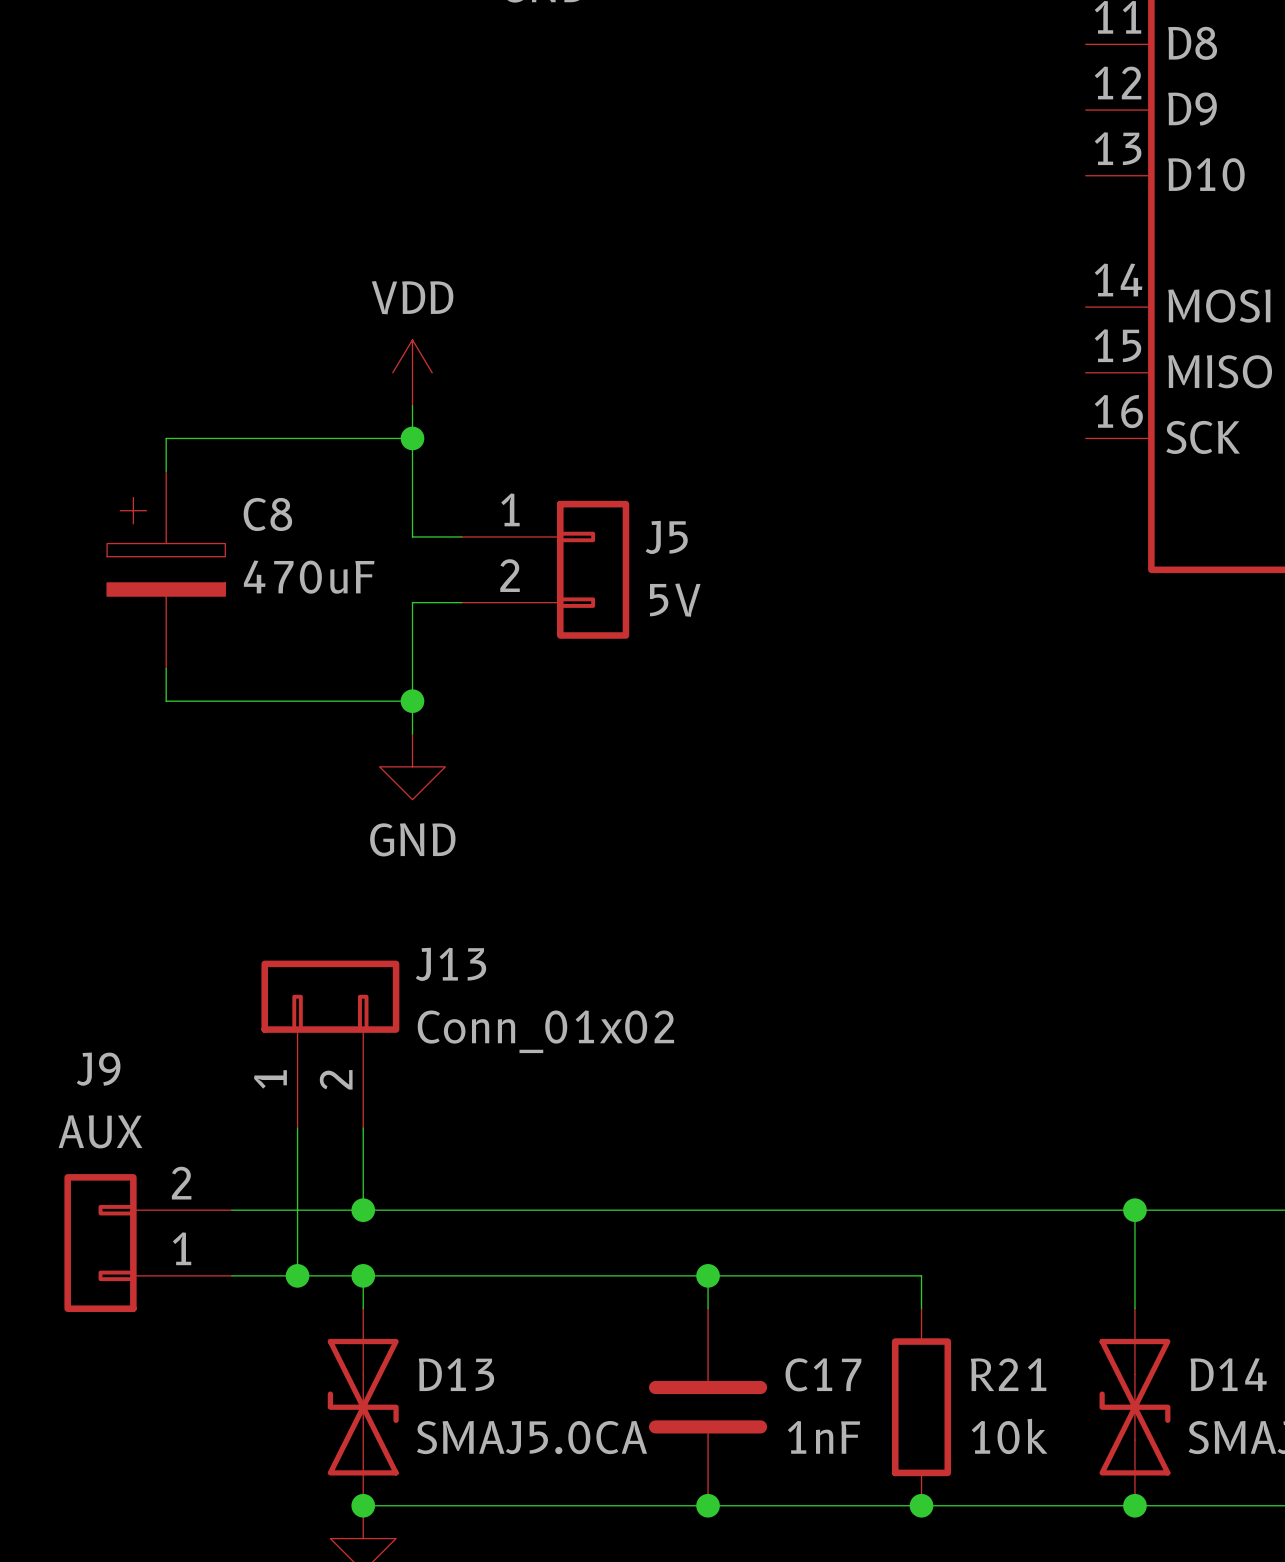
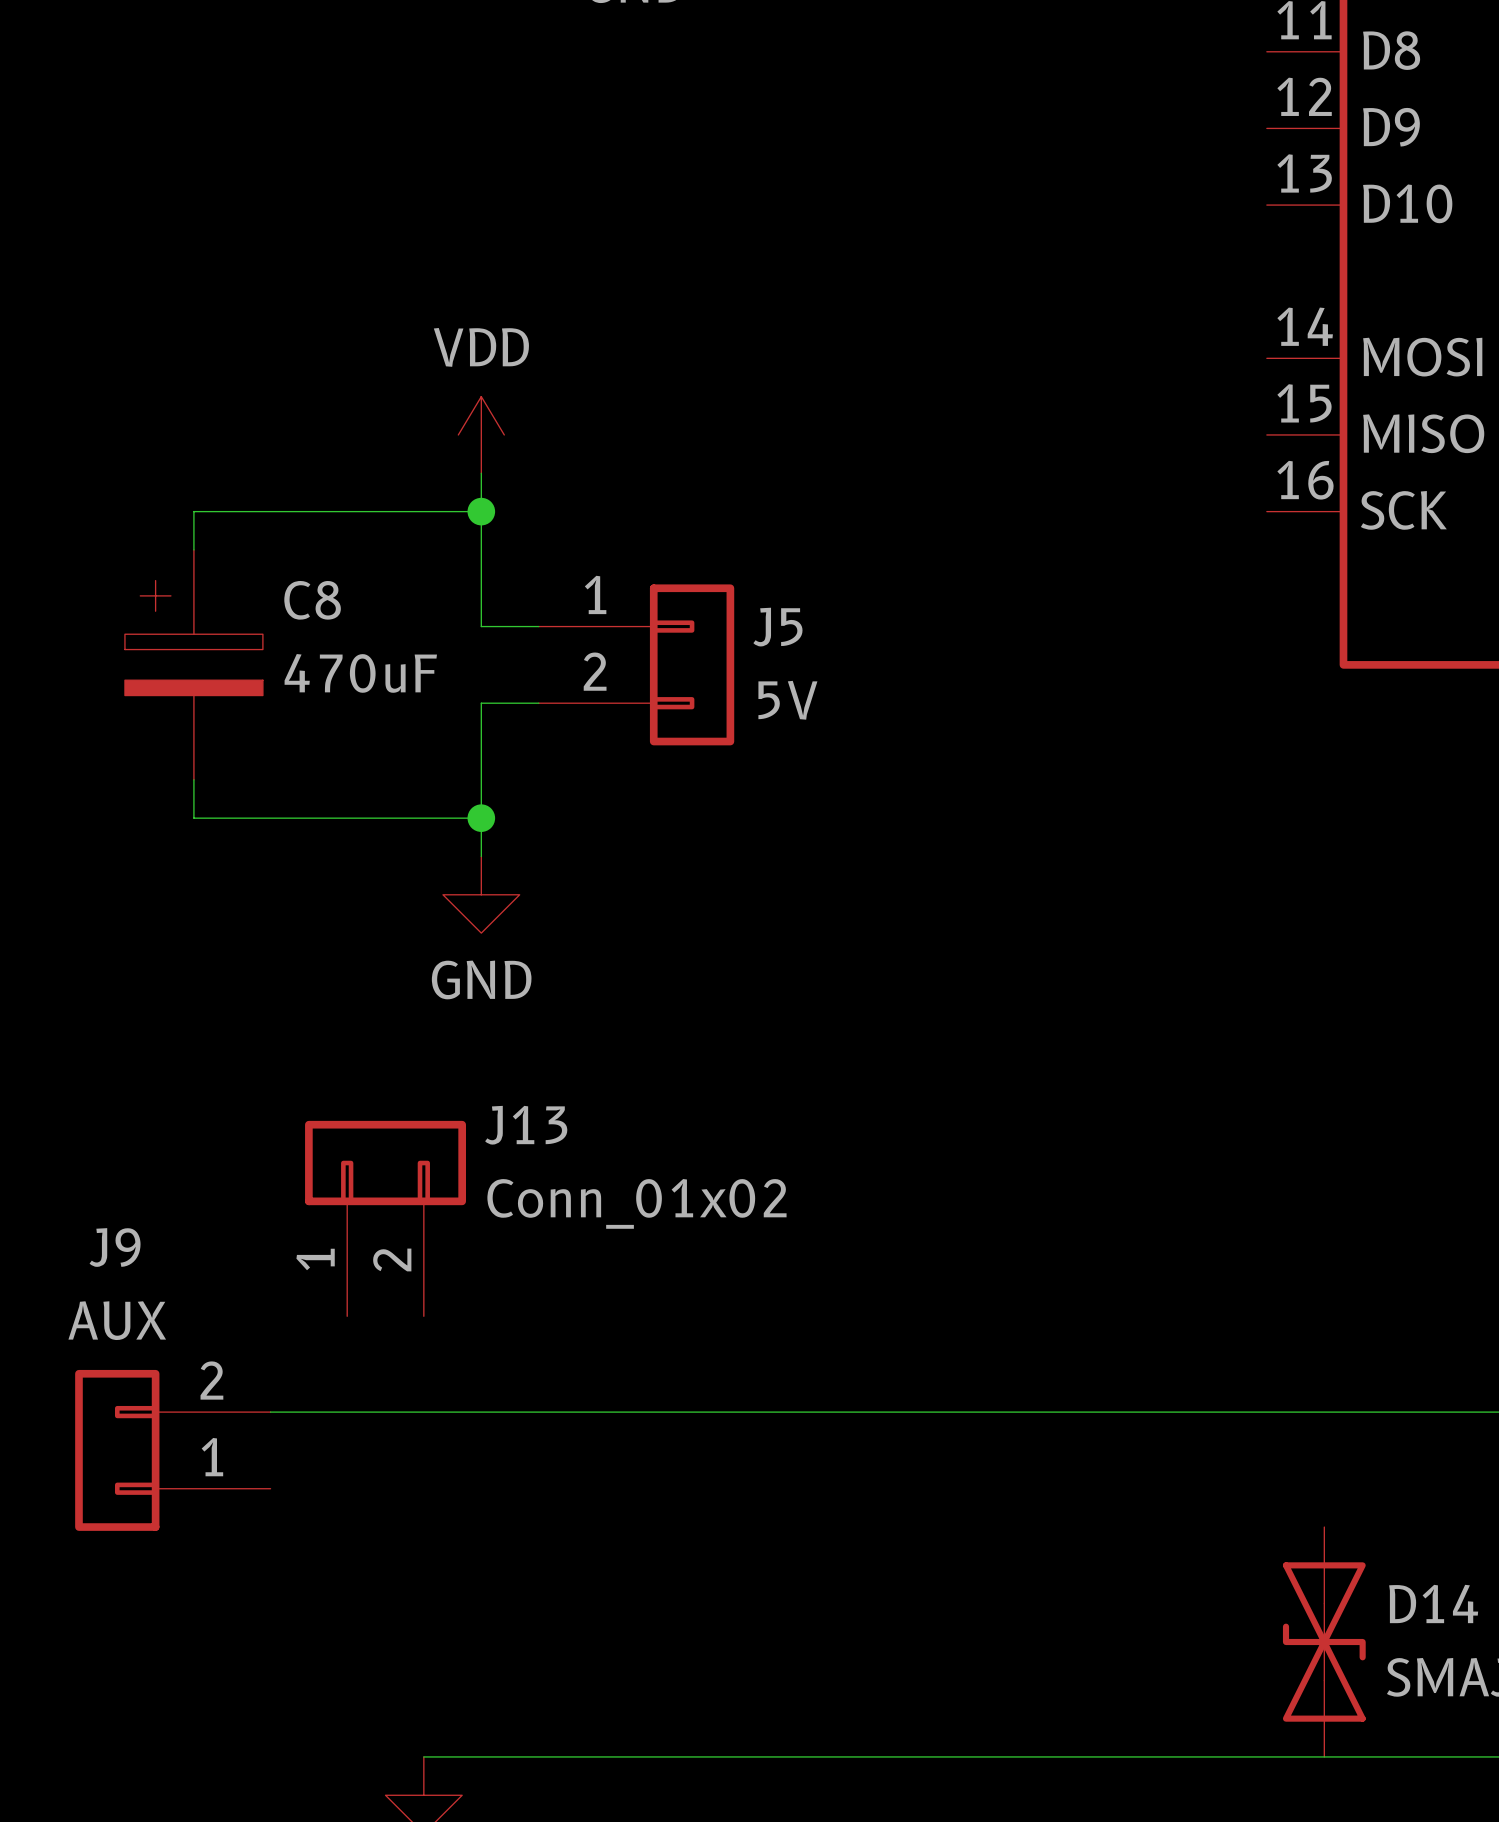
wire: (297, 1128) (297, 1275) -> none
wire: (363, 1128) (363, 1210) -> none
junction: (363, 1210) -> none
wire: (1134, 1210) (1134, 1308) -> none
junction: (1134, 1210) -> none
wire: (231, 1275) (921, 1275) (921, 1308) -> none
junction: (297, 1275) -> none
wire: (363, 1275) (363, 1308) -> none
junction: (363, 1275) -> none
wire: (708, 1275) (708, 1308) -> none
junction: (708, 1275) -> none
D13: SMAJ5.0CA (363, 1407) -> none
C17: 1nF (708, 1407) -> none
R21: 10k (921, 1407) -> none
junction: (363, 1505) -> none
junction: (708, 1505) -> none
junction: (921, 1505) -> none
junction: (1134, 1505) -> none

